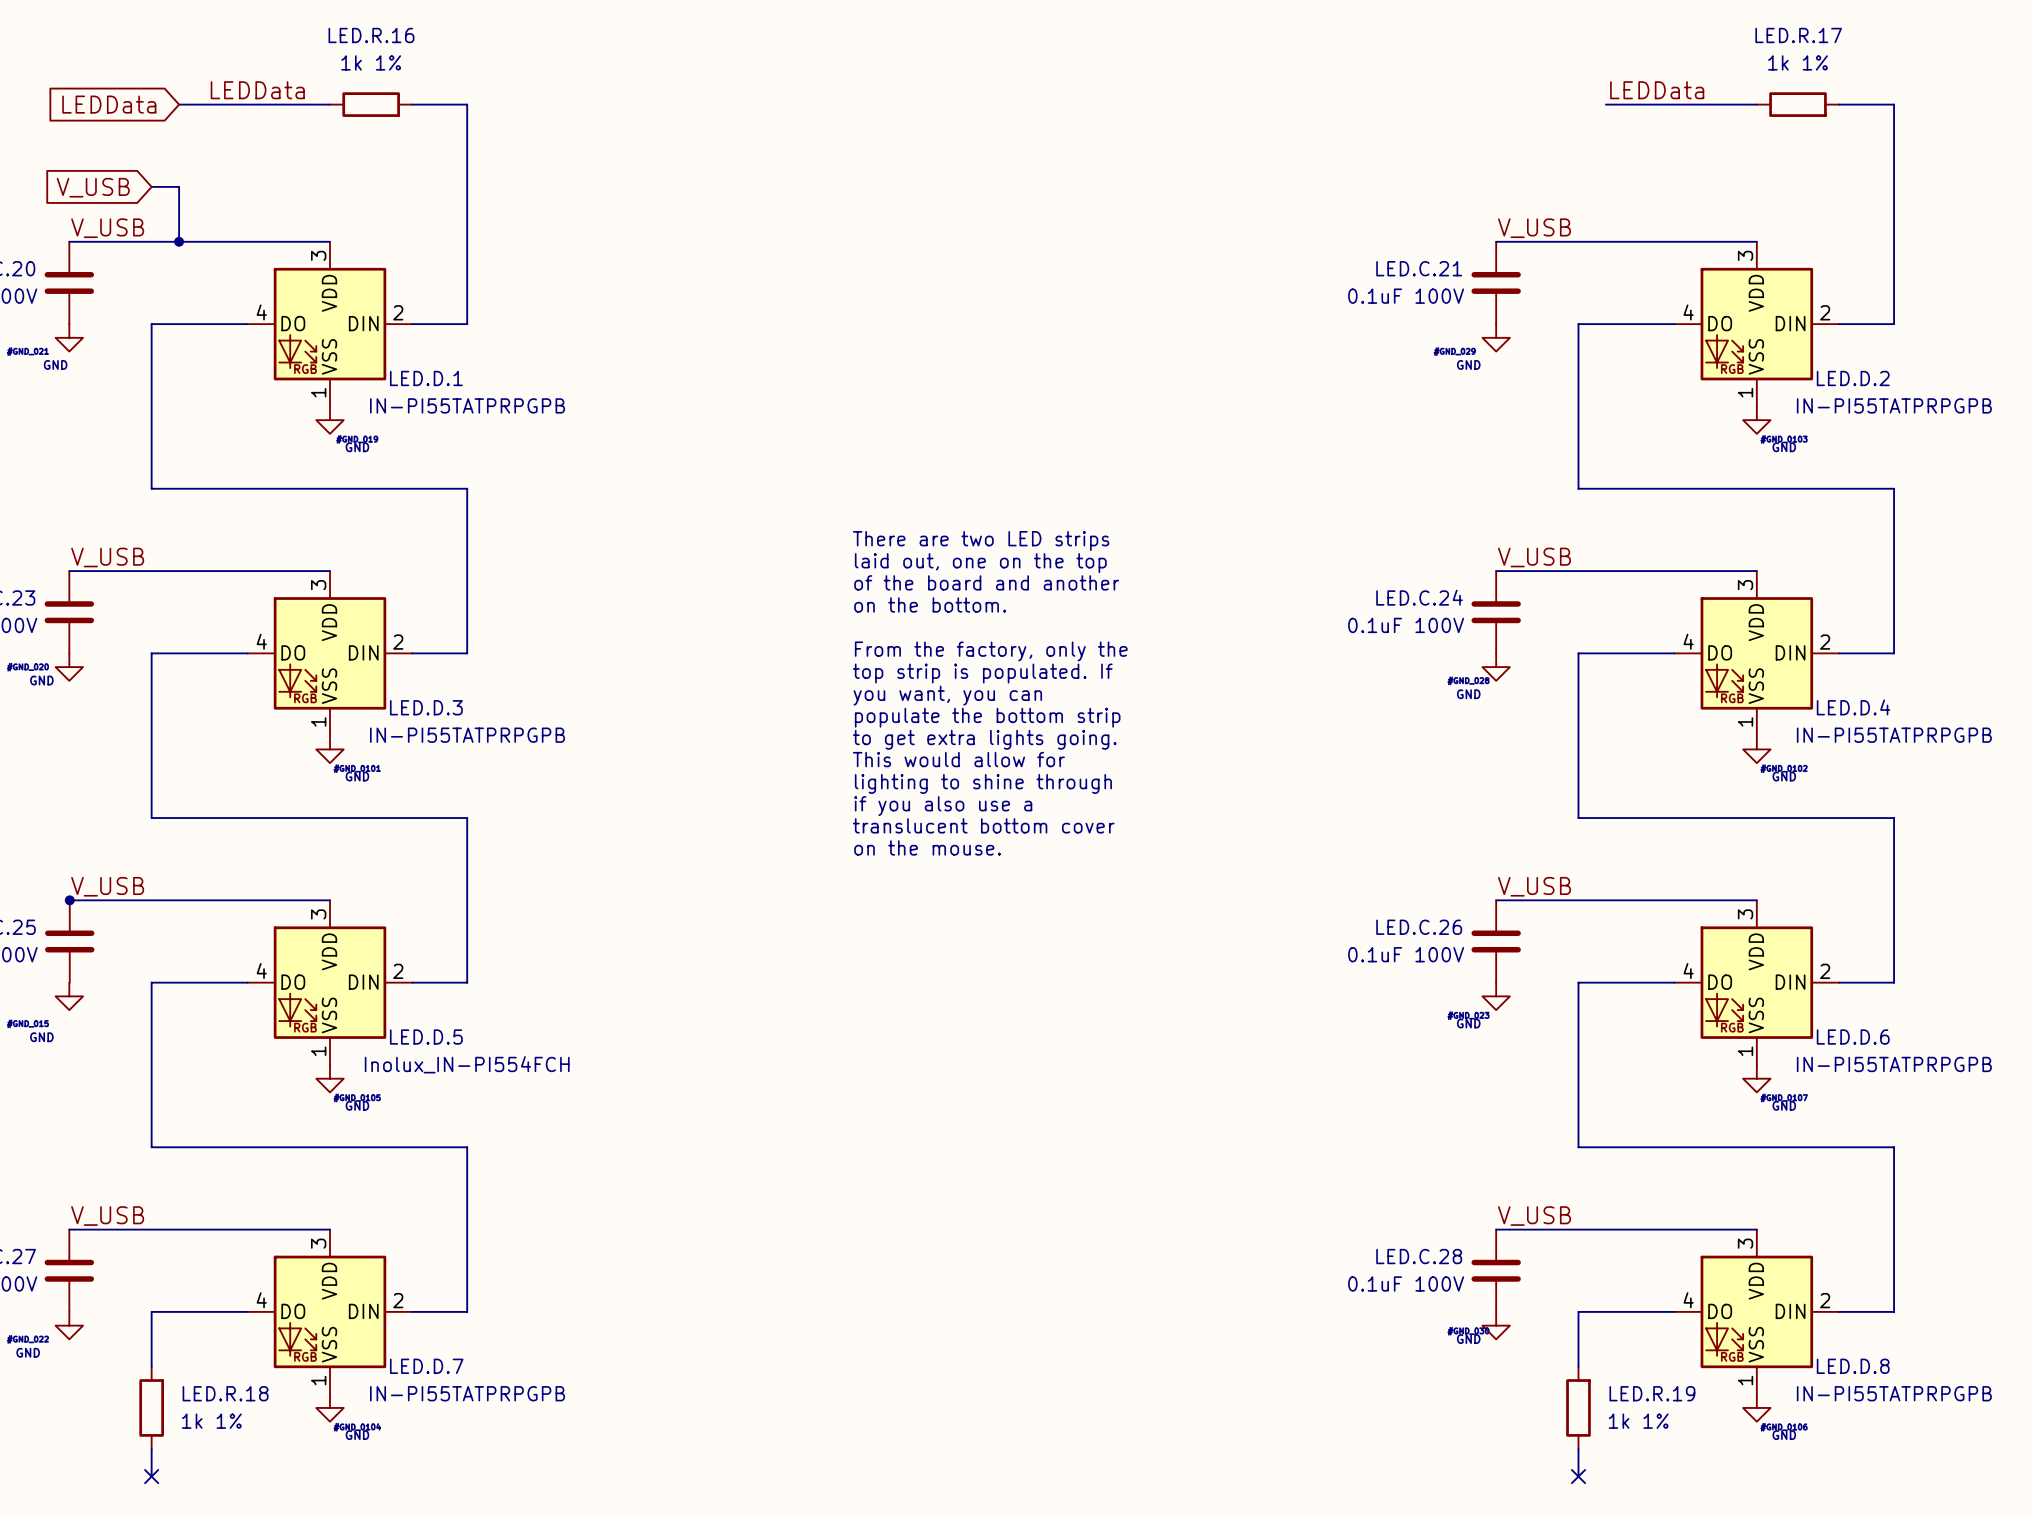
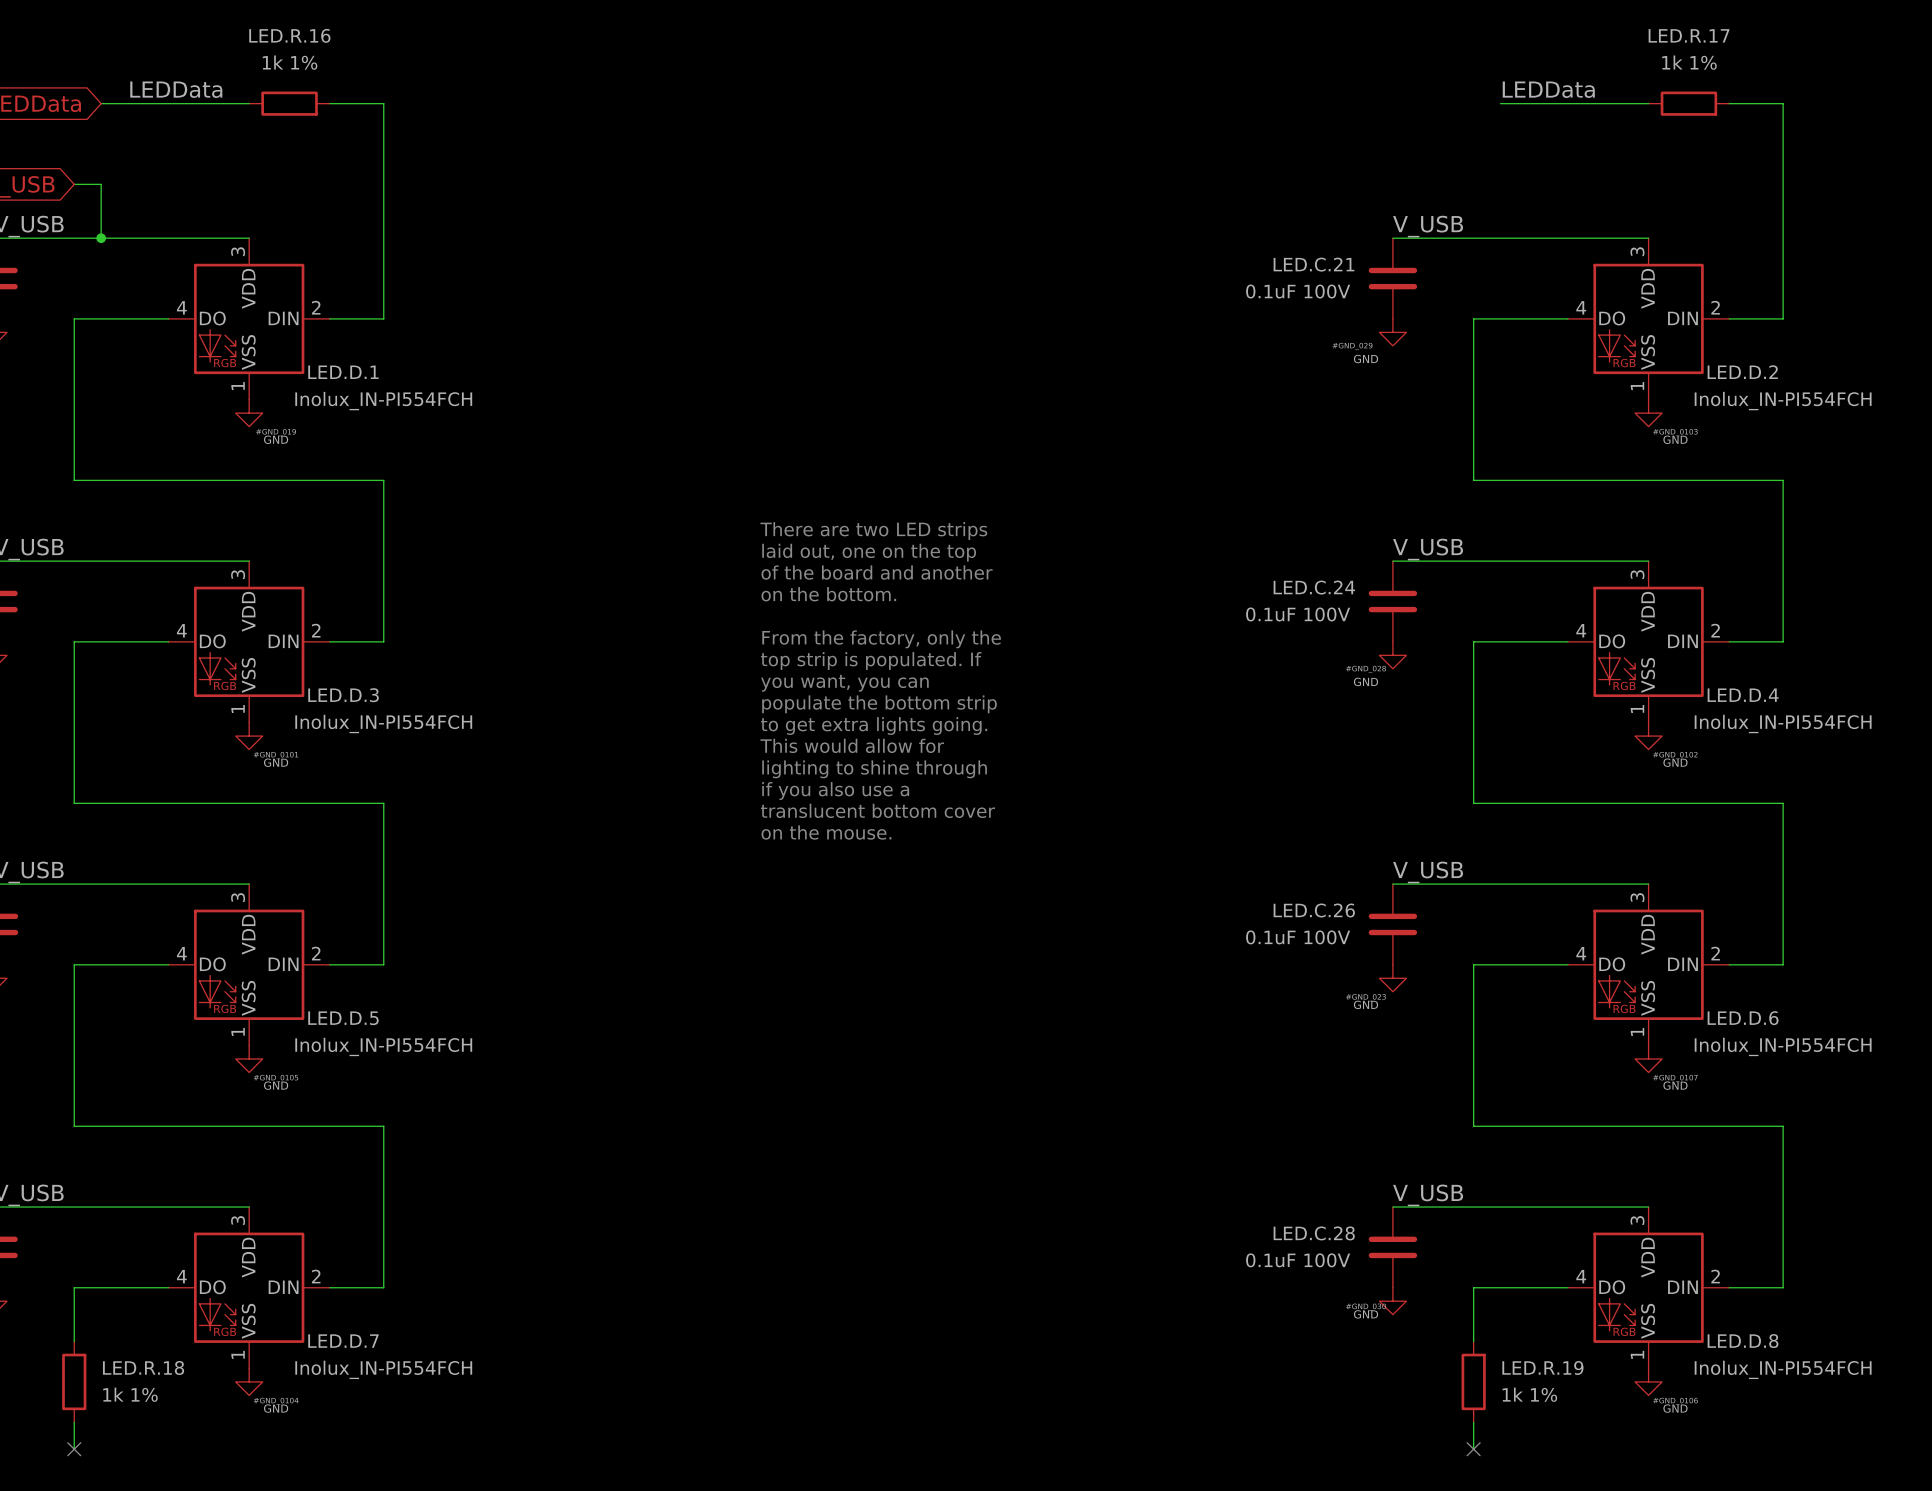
LED.D.1 value: IN-PI55TATPRPGPB (467, 405) -> Inolux_IN-PI554FCH (383, 401)
LED.D.2 value: IN-PI55TATPRPGPB (1894, 405) -> Inolux_IN-PI554FCH (1783, 401)
LED.D.3 value: IN-PI55TATPRPGPB (467, 735) -> Inolux_IN-PI554FCH (383, 724)
LED.D.4 value: IN-PI55TATPRPGPB (1894, 735) -> Inolux_IN-PI554FCH (1783, 724)
LED.D.6 value: IN-PI55TATPRPGPB (1894, 1064) -> Inolux_IN-PI554FCH (1783, 1046)
LED.D.7 value: IN-PI55TATPRPGPB (467, 1393) -> Inolux_IN-PI554FCH (383, 1369)
LED.D.8 value: IN-PI55TATPRPGPB (1894, 1393) -> Inolux_IN-PI554FCH (1783, 1369)

